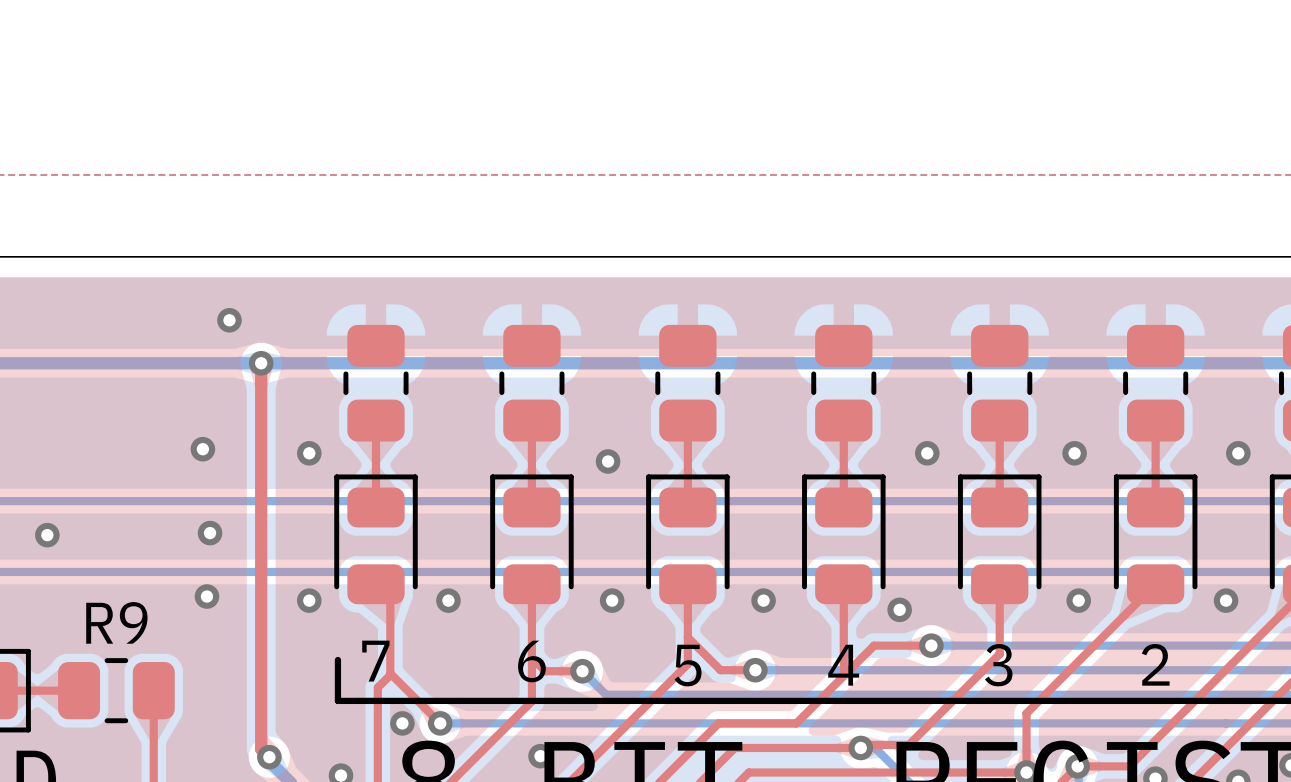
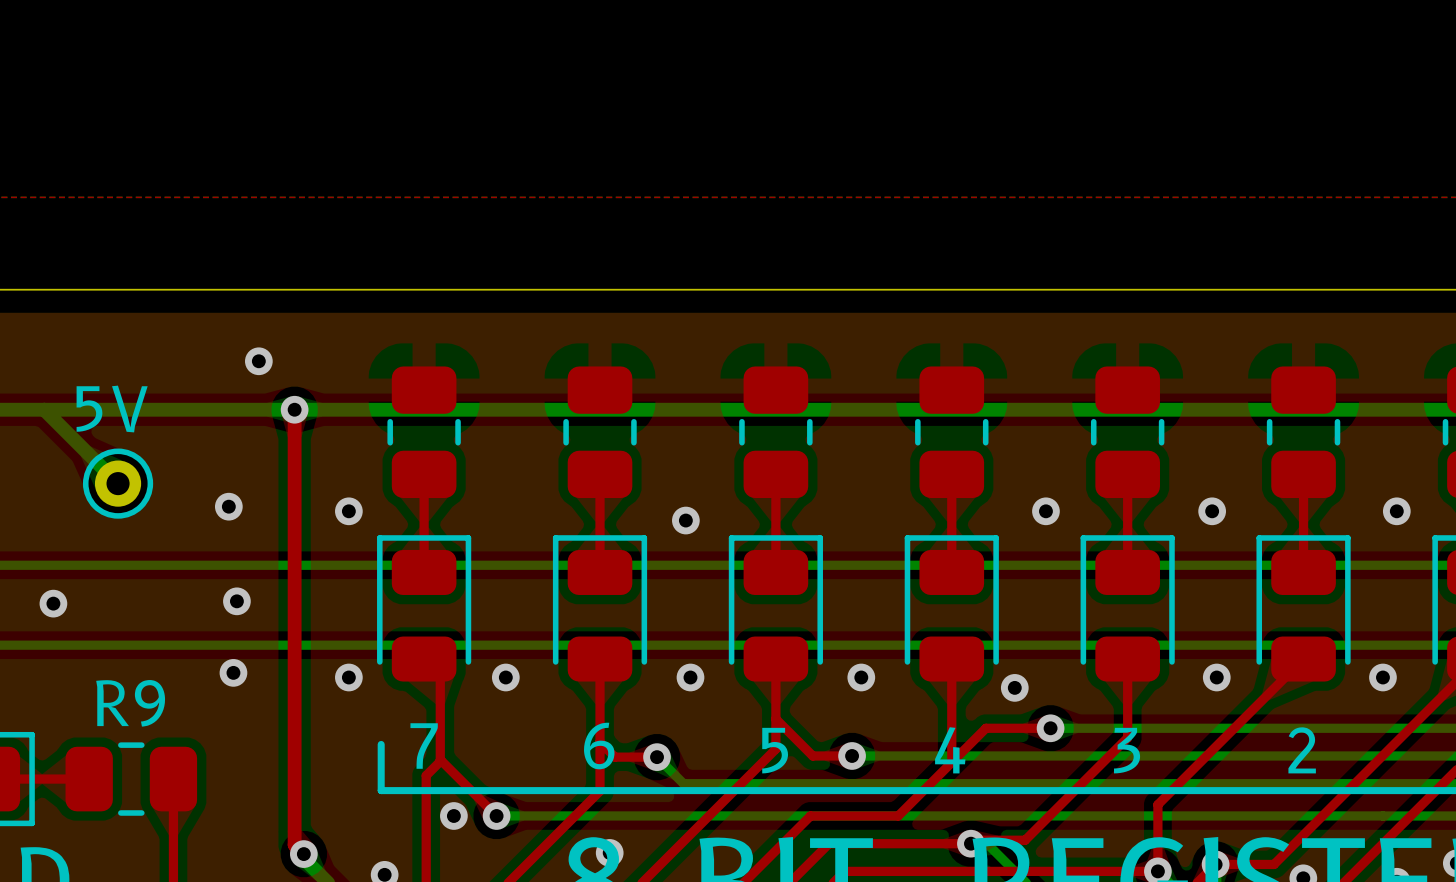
text: none -> 5V (112, 409)
bottom track: none -> (44, 409) (118, 483)
part: none -> (118, 483)

